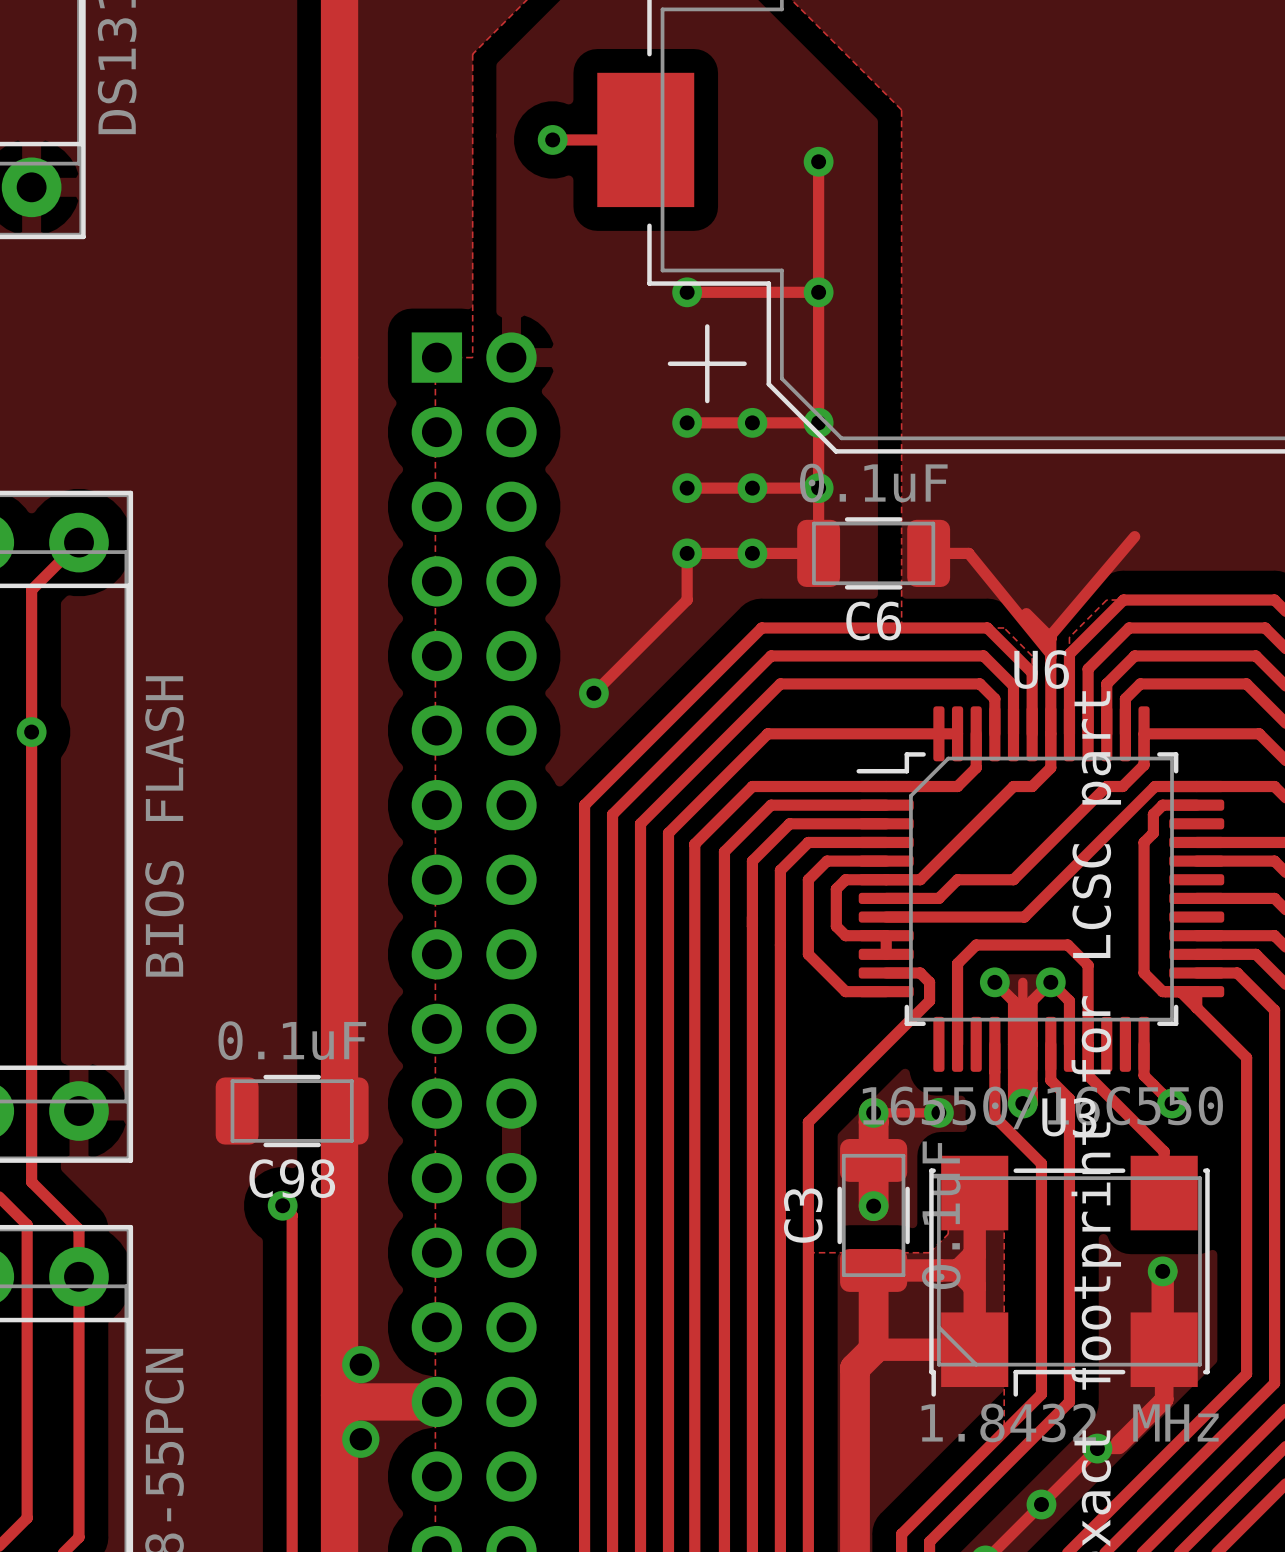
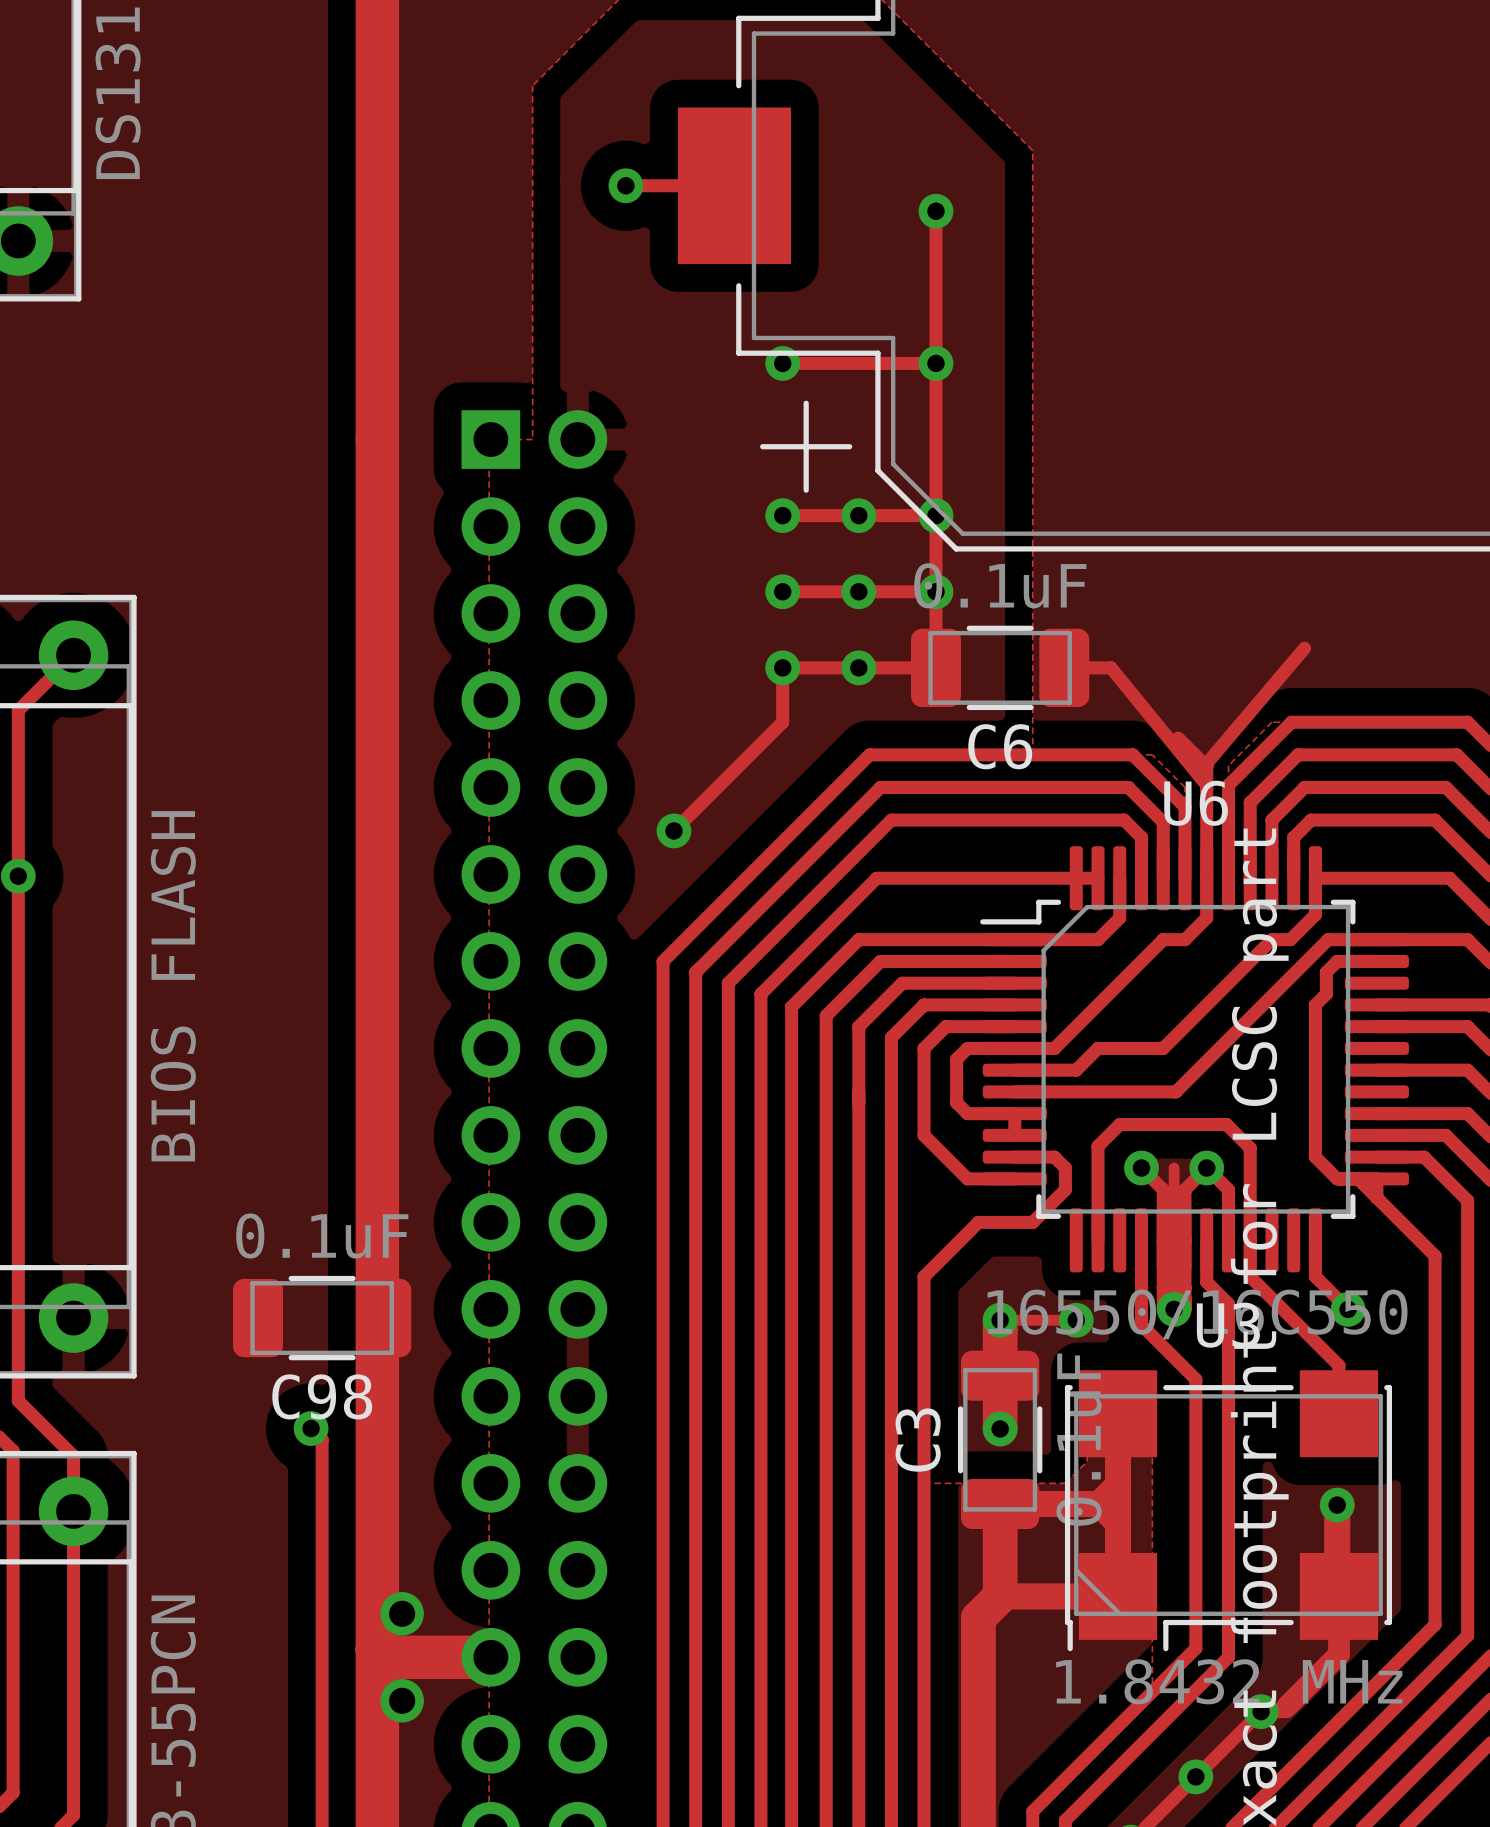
track: (901, 1028) (808, 1122) -> (1032, 1222) (978, 1222) (924, 1276) (924, 1331)

